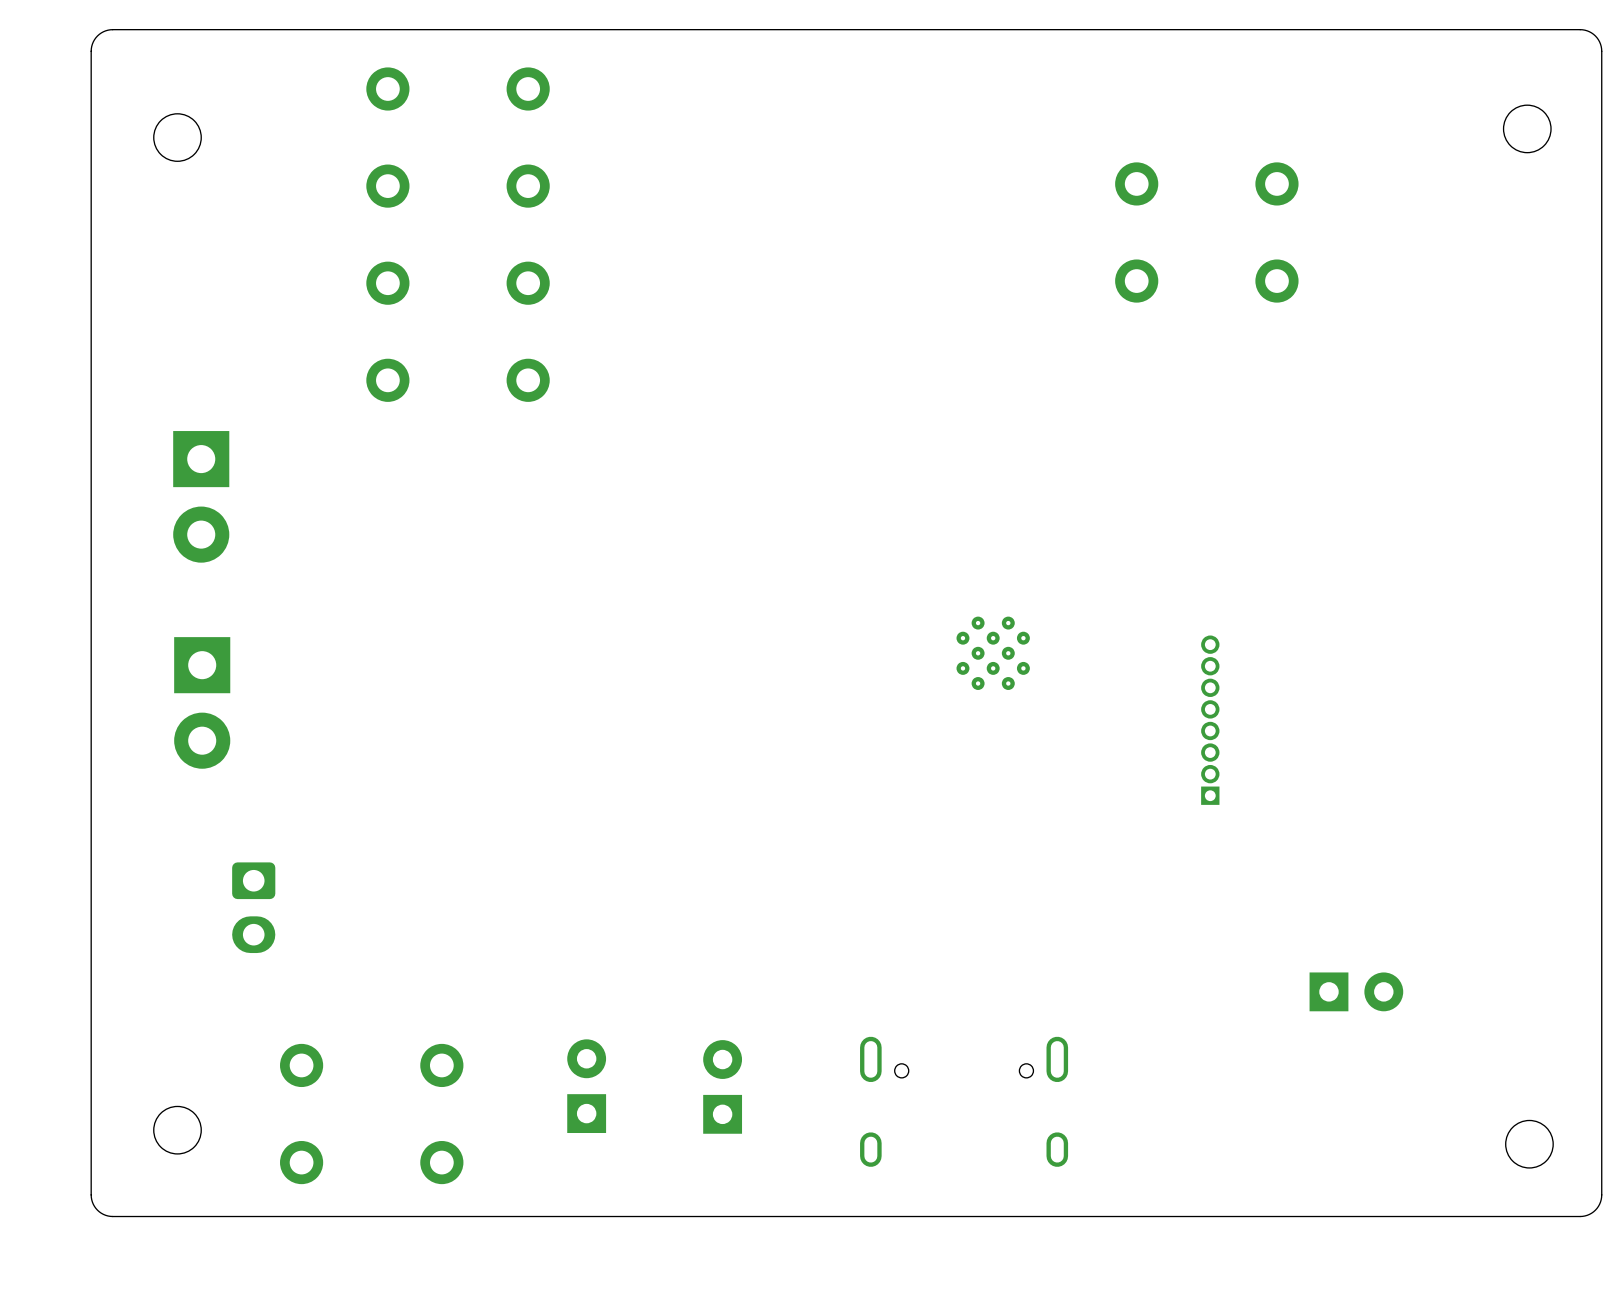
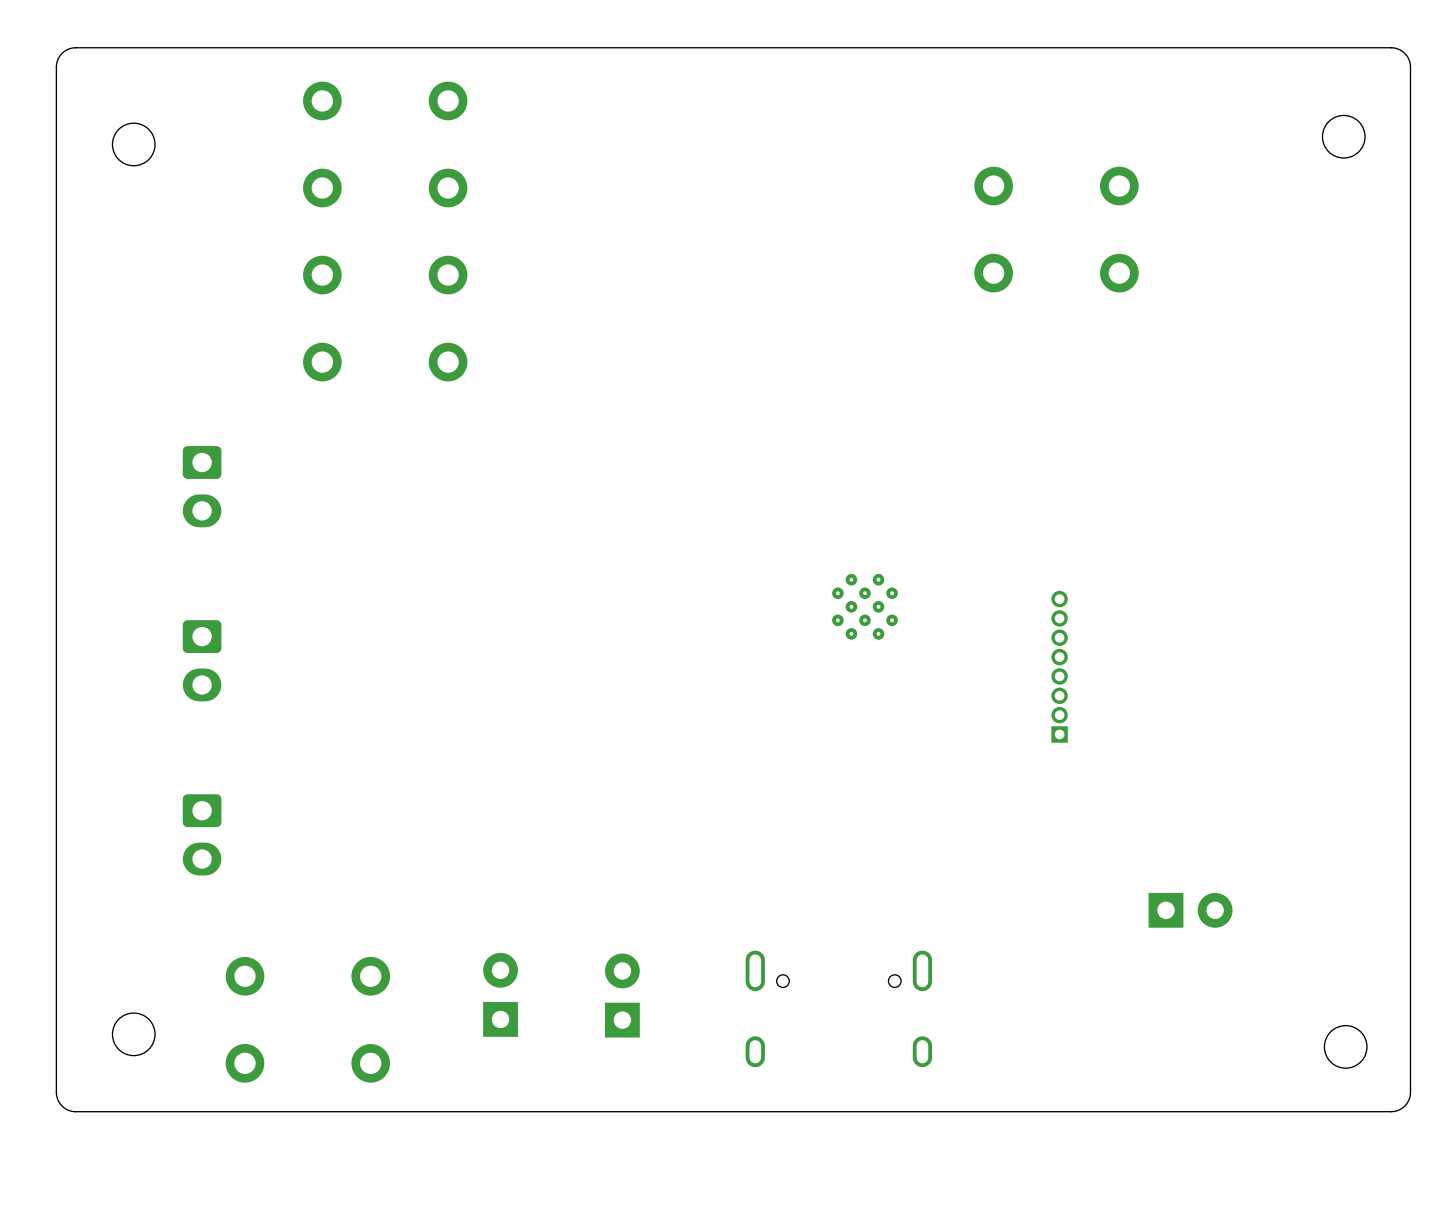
part: (201, 496) -> none
part: none -> (202, 486)
part: (202, 702) -> none
part: none -> (202, 660)

